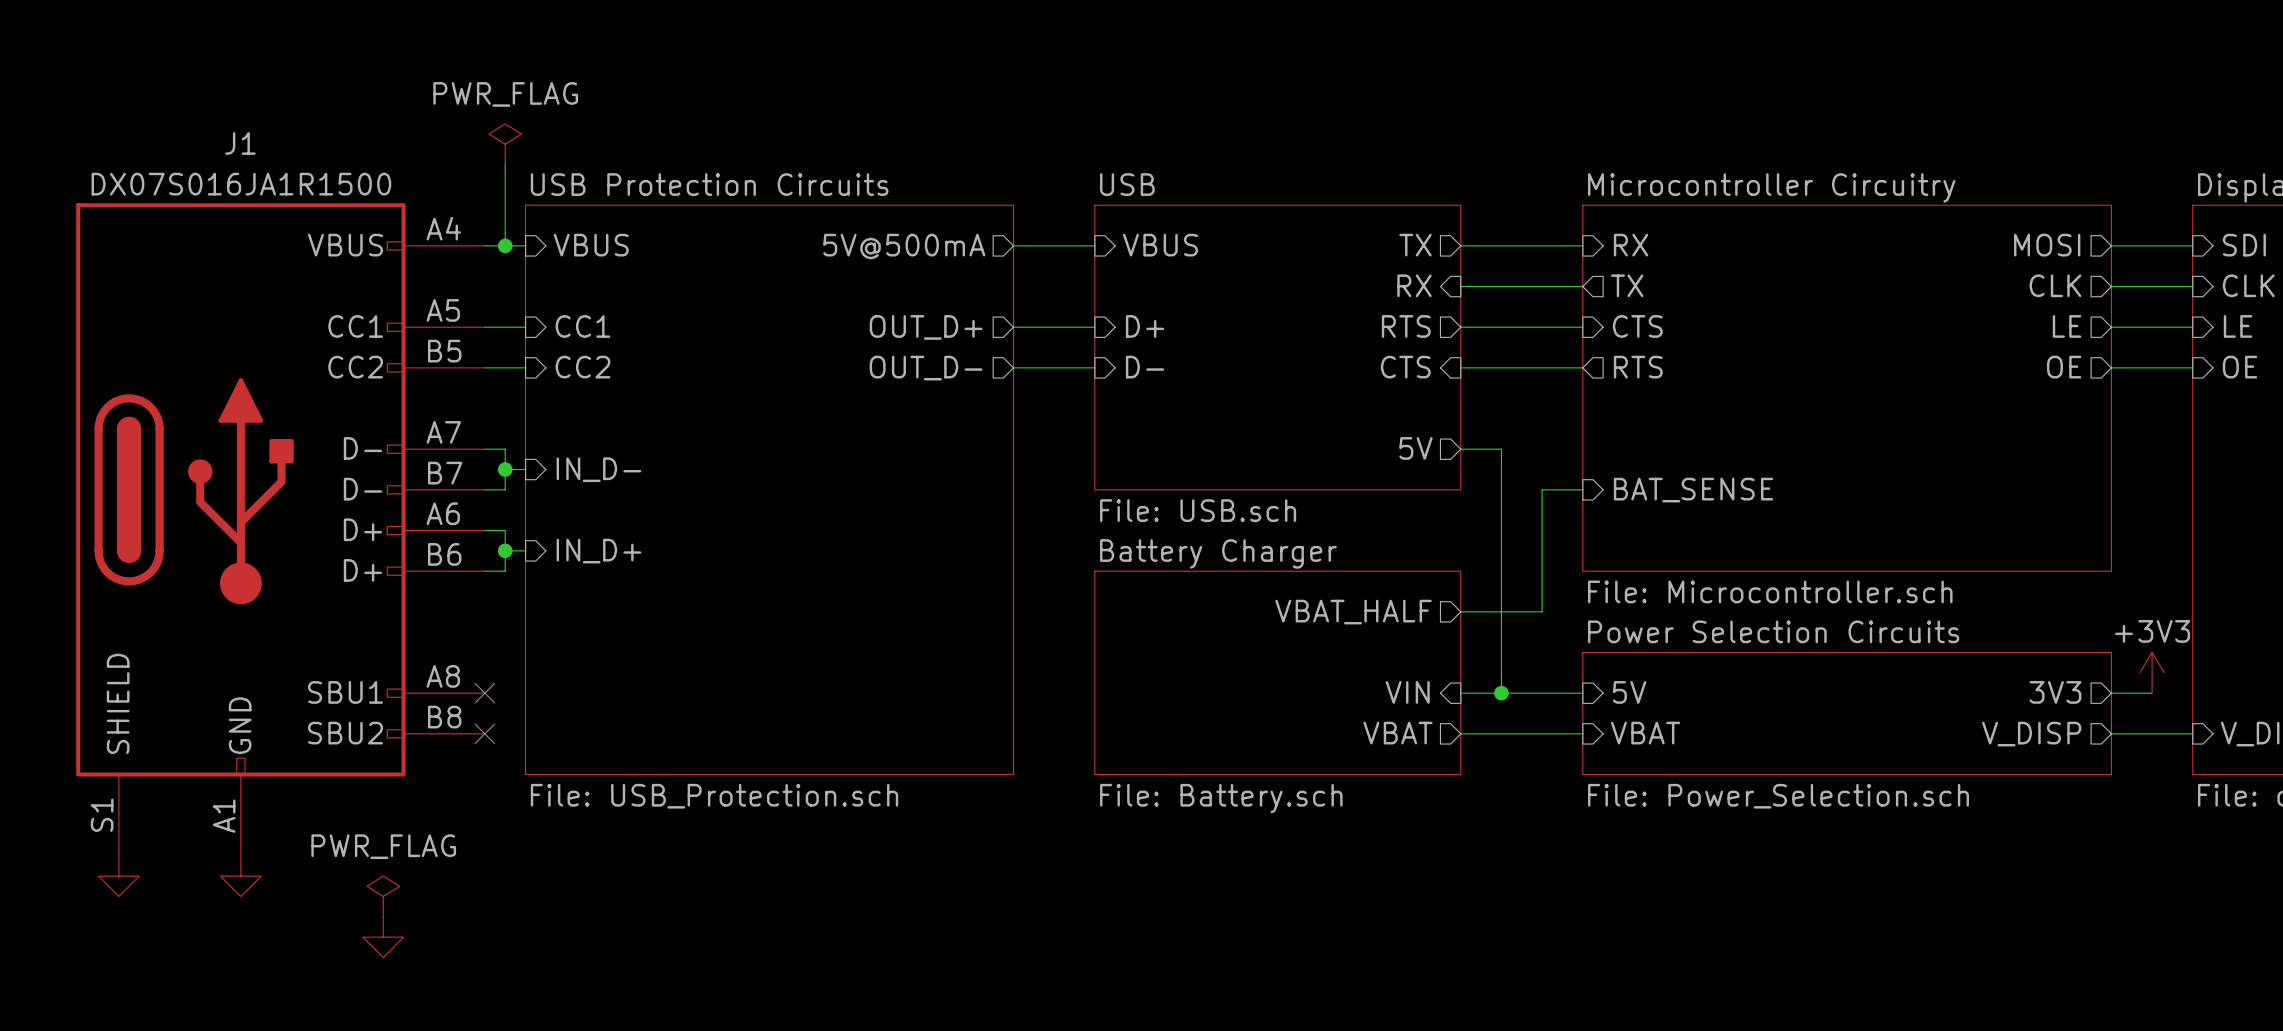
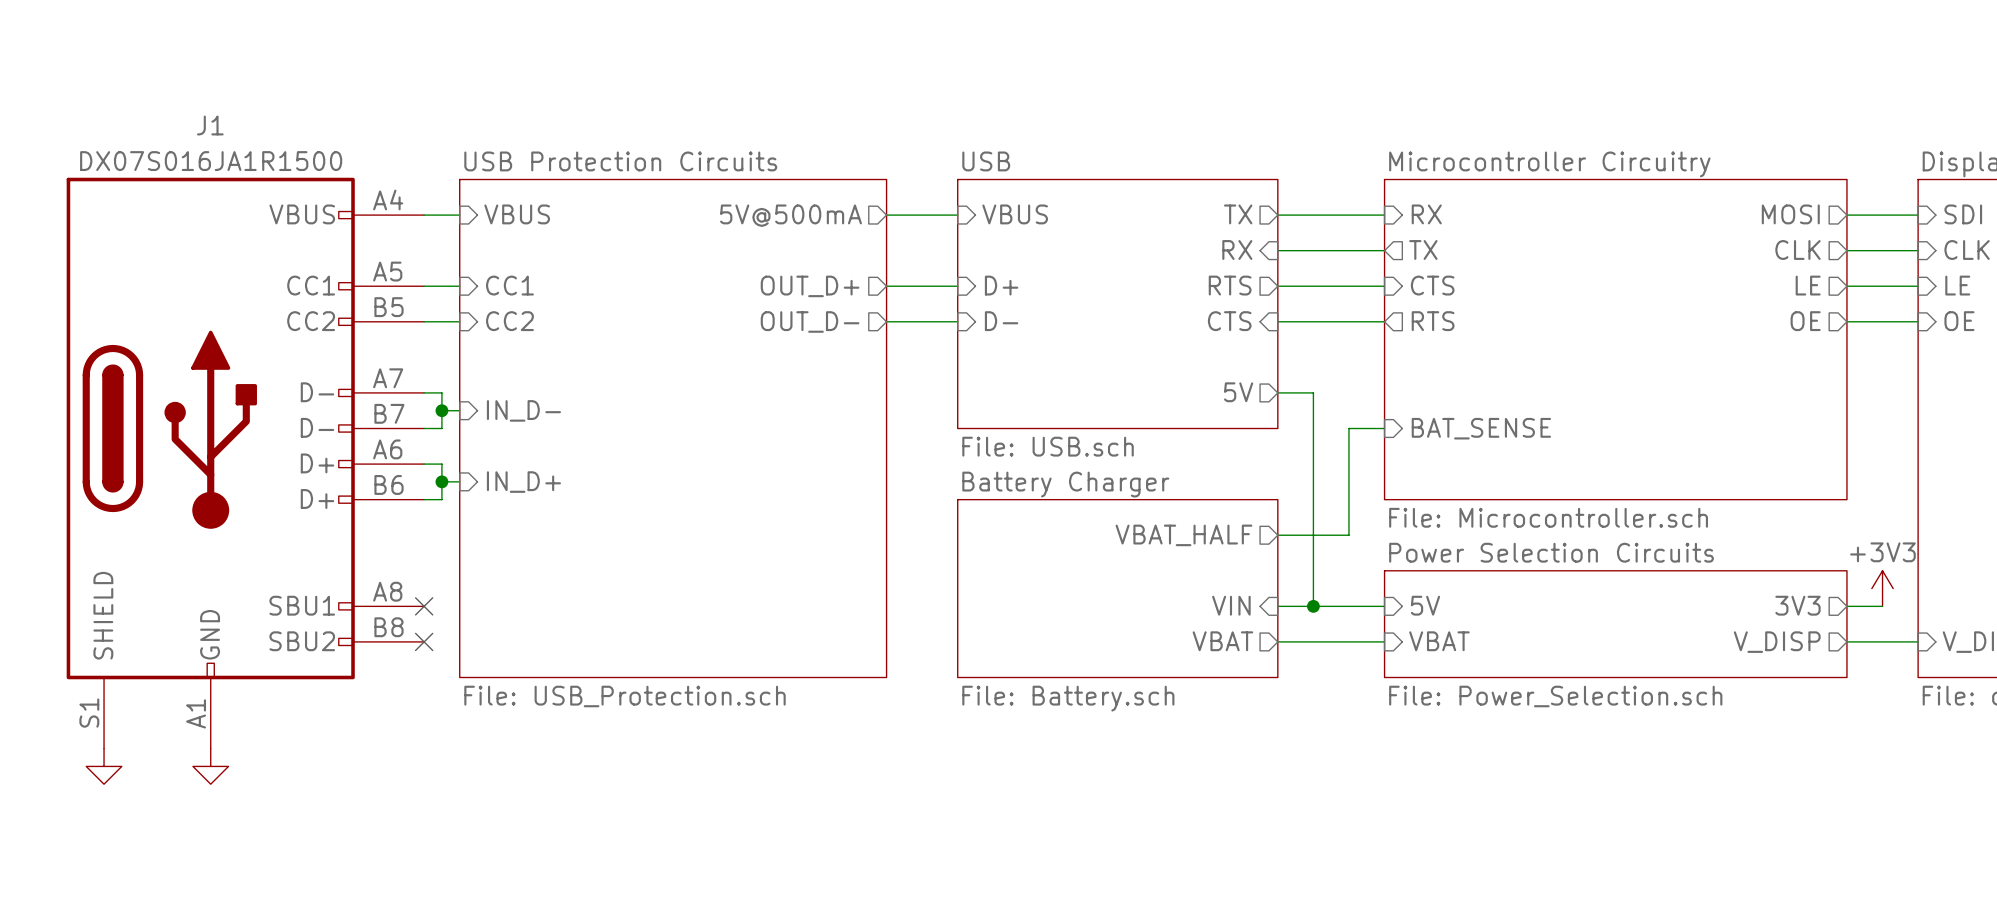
power symbol: PWR_FLAG (505, 144) -> none
wire: (505, 164) (505, 245) -> none
junction: (505, 245) -> none
power symbol: PWR_FLAG (383, 896) -> none
power symbol: (383, 937) -> none

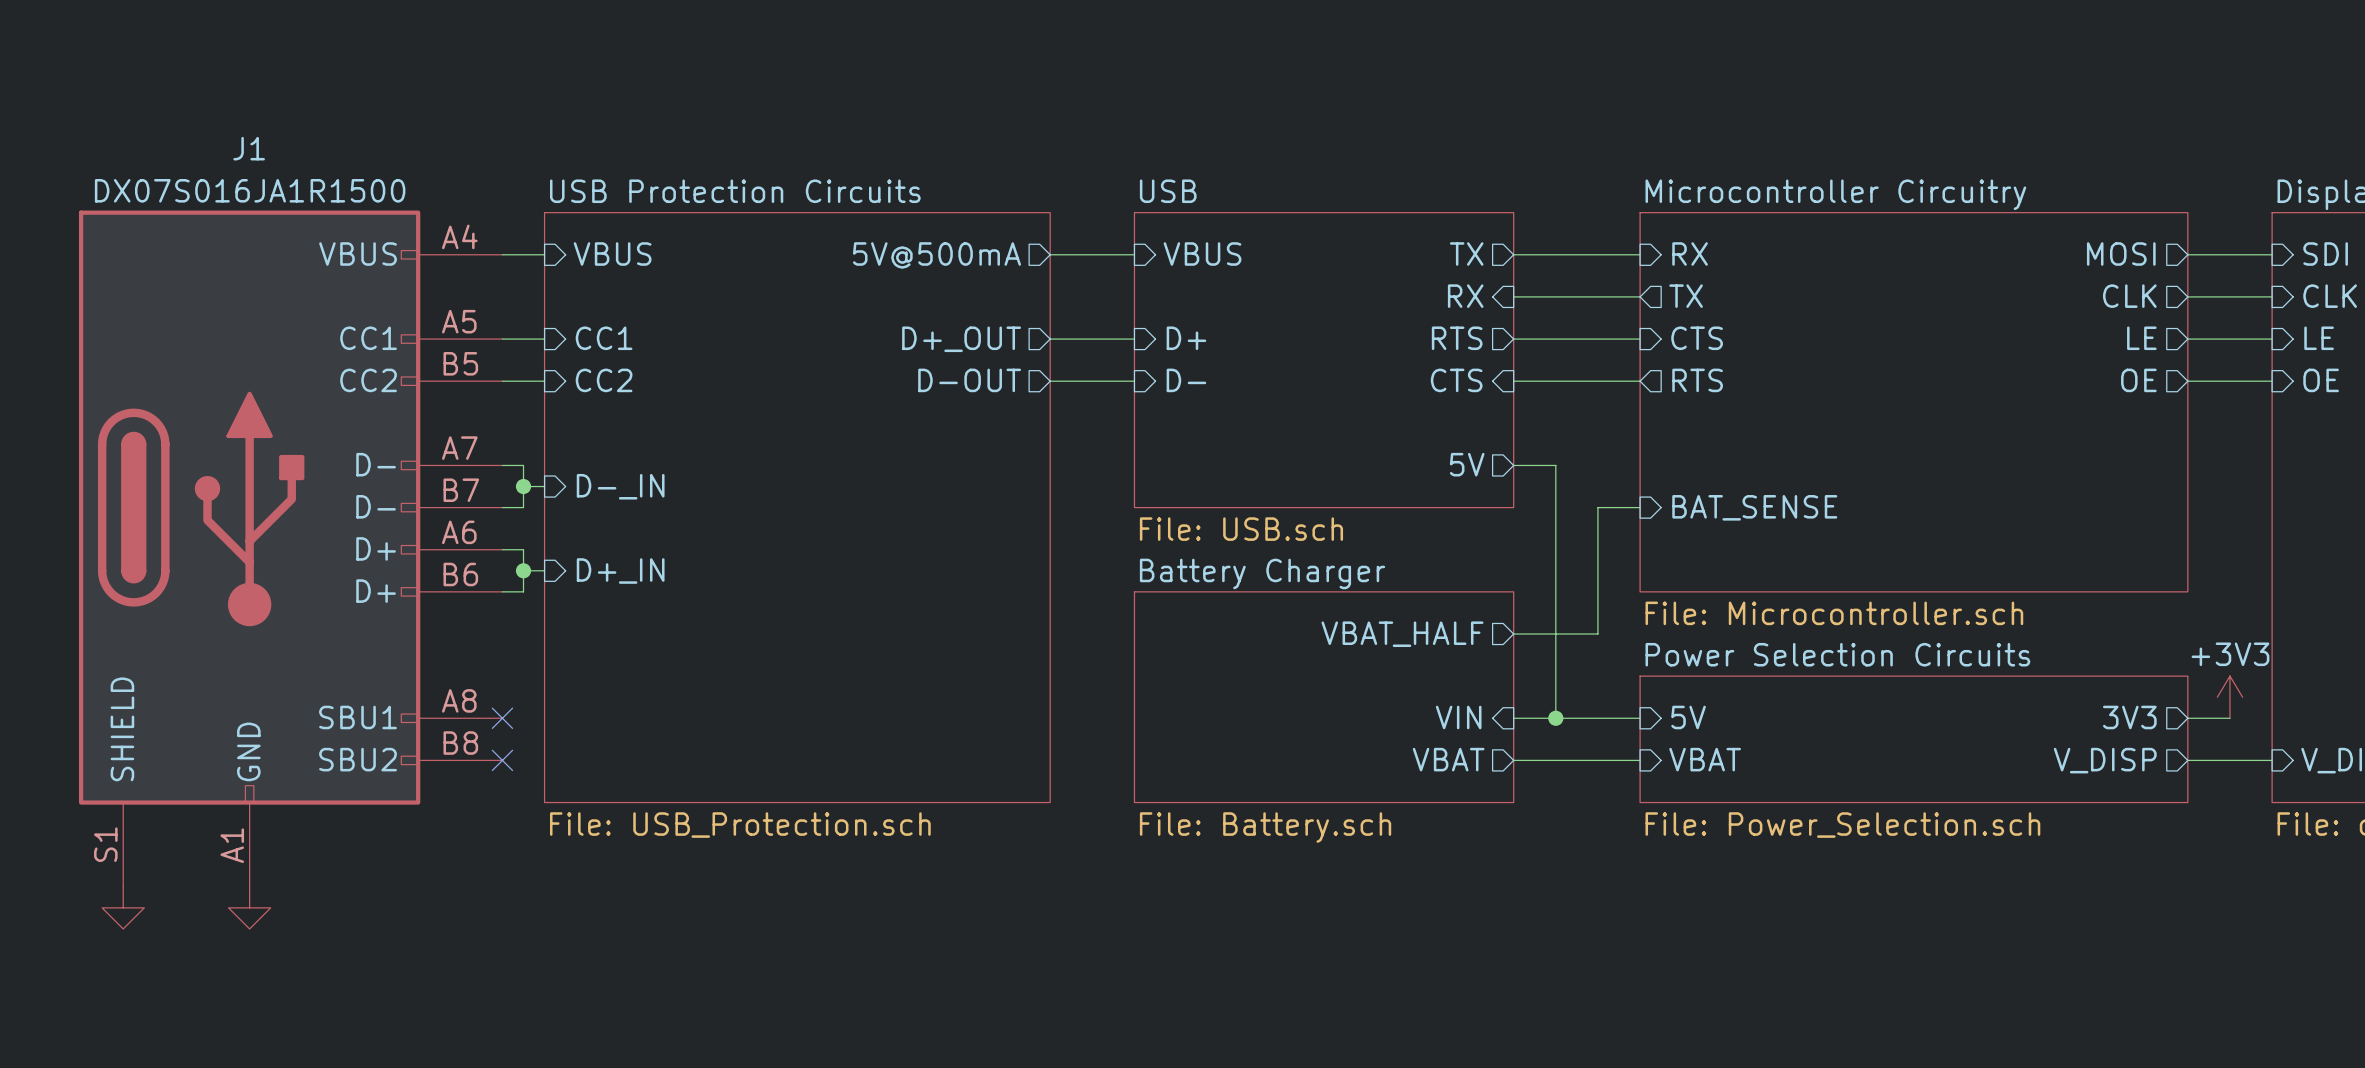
sheet pin: OUT_D+ (810, 286) -> D+_OUT (961, 339)
sheet pin: OUT_D- (810, 321) -> D-OUT (969, 380)
sheet pin: IN_D- (523, 410) -> D-_IN (620, 486)
sheet pin: IN_D+ (523, 482) -> D+_IN (620, 571)

